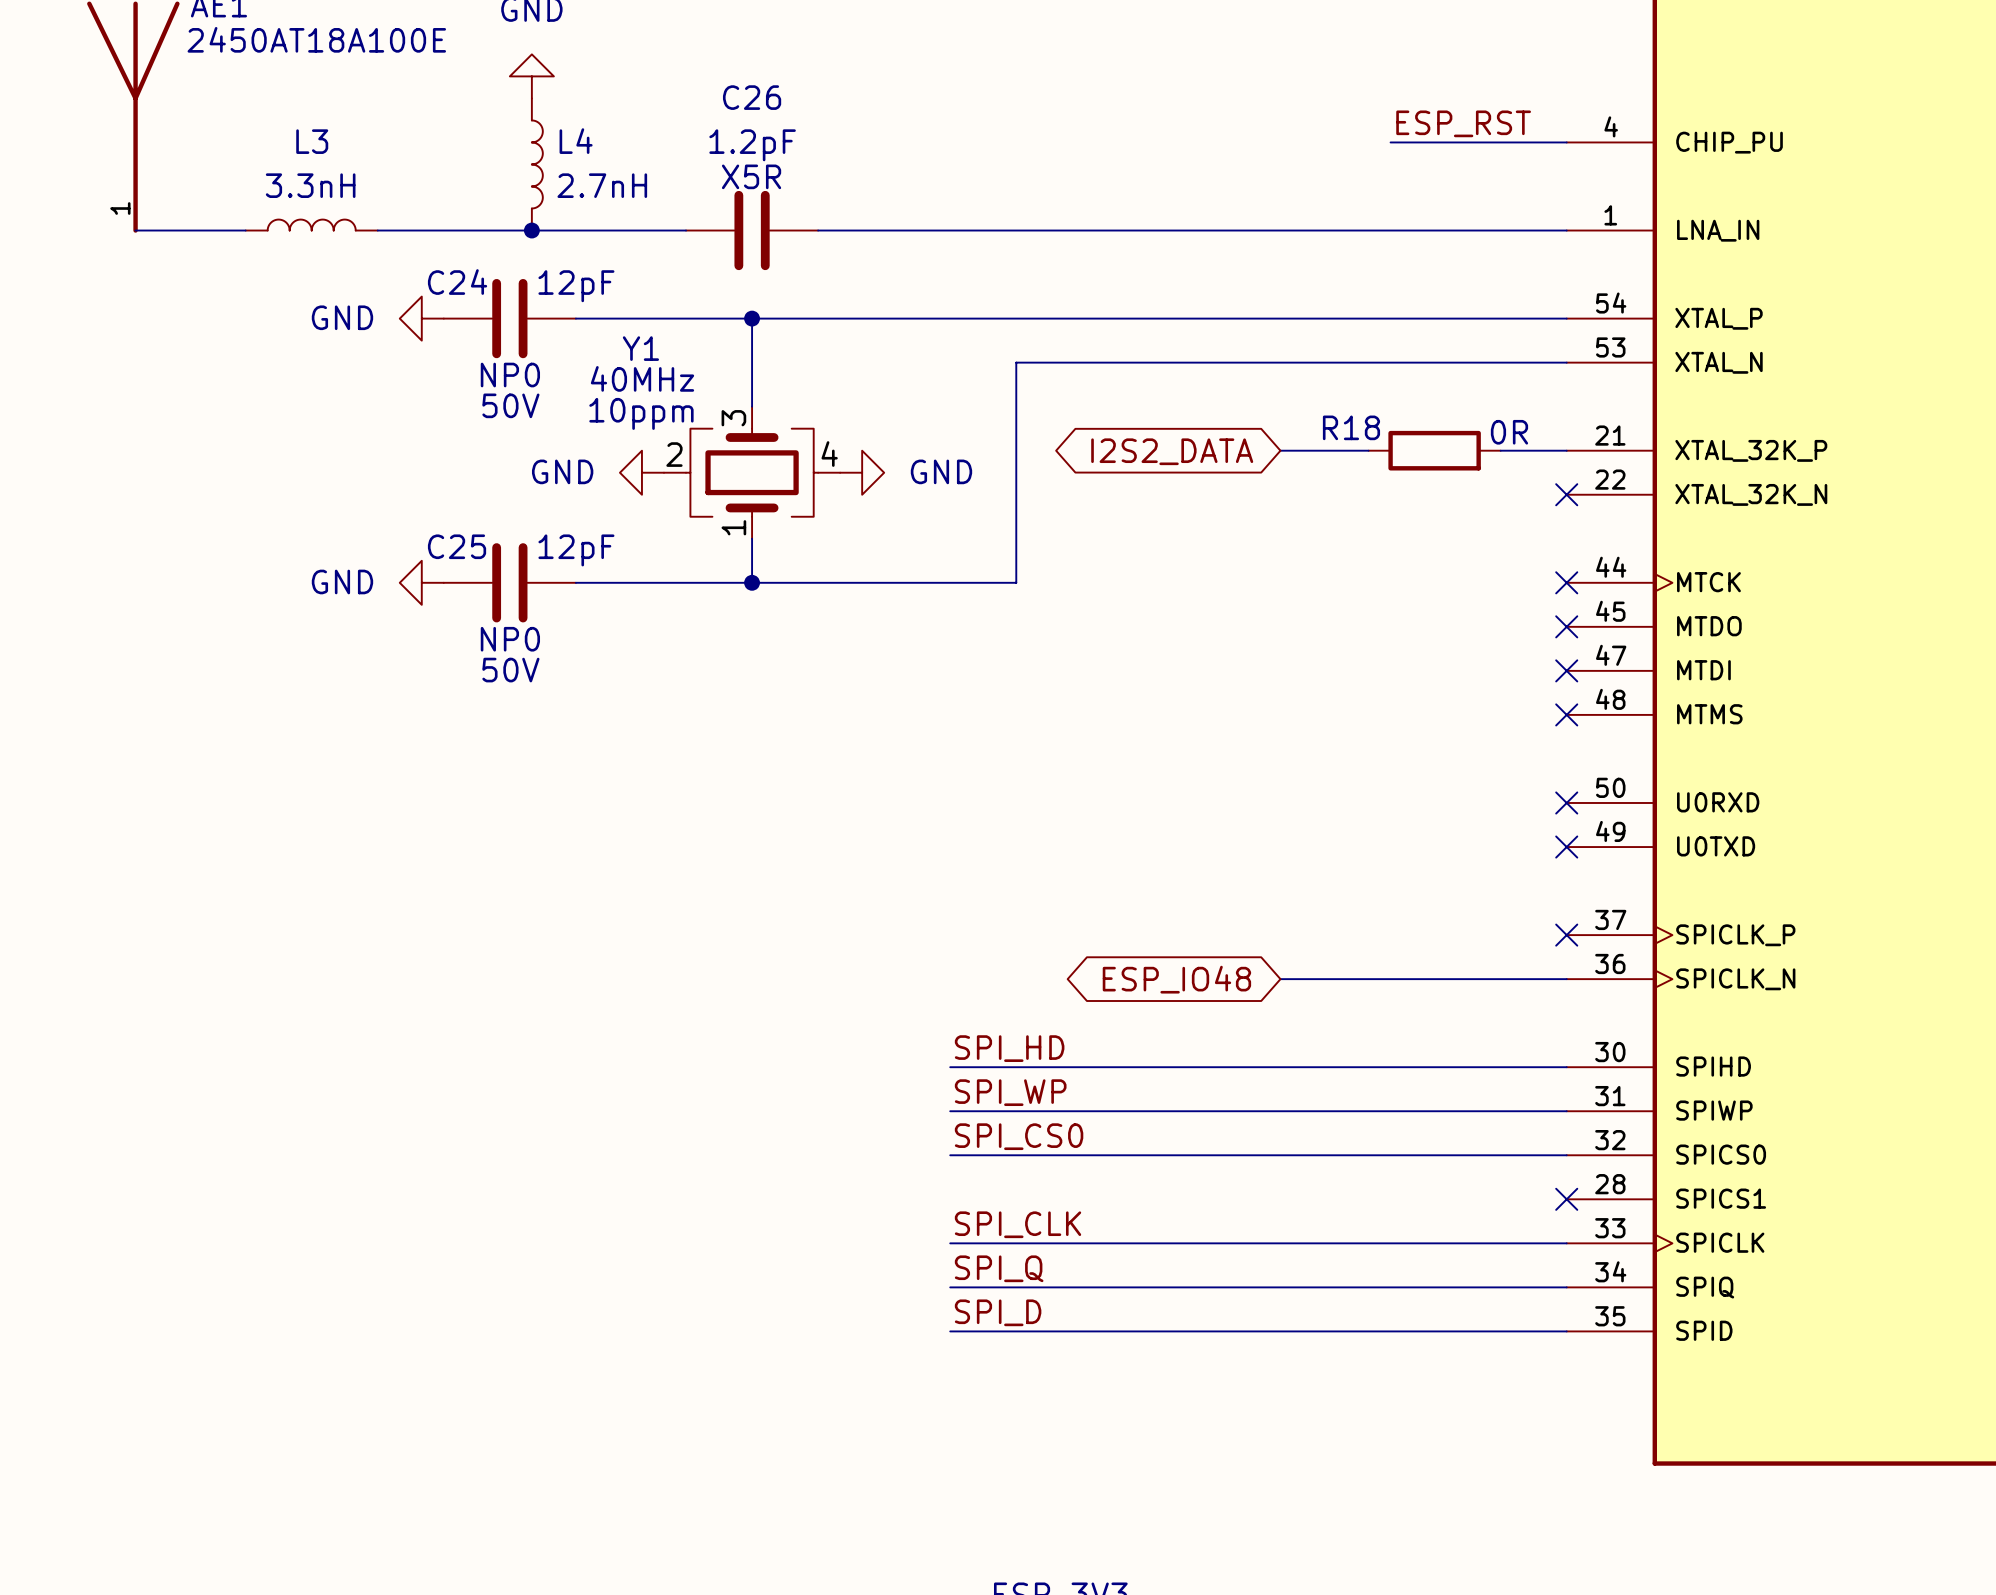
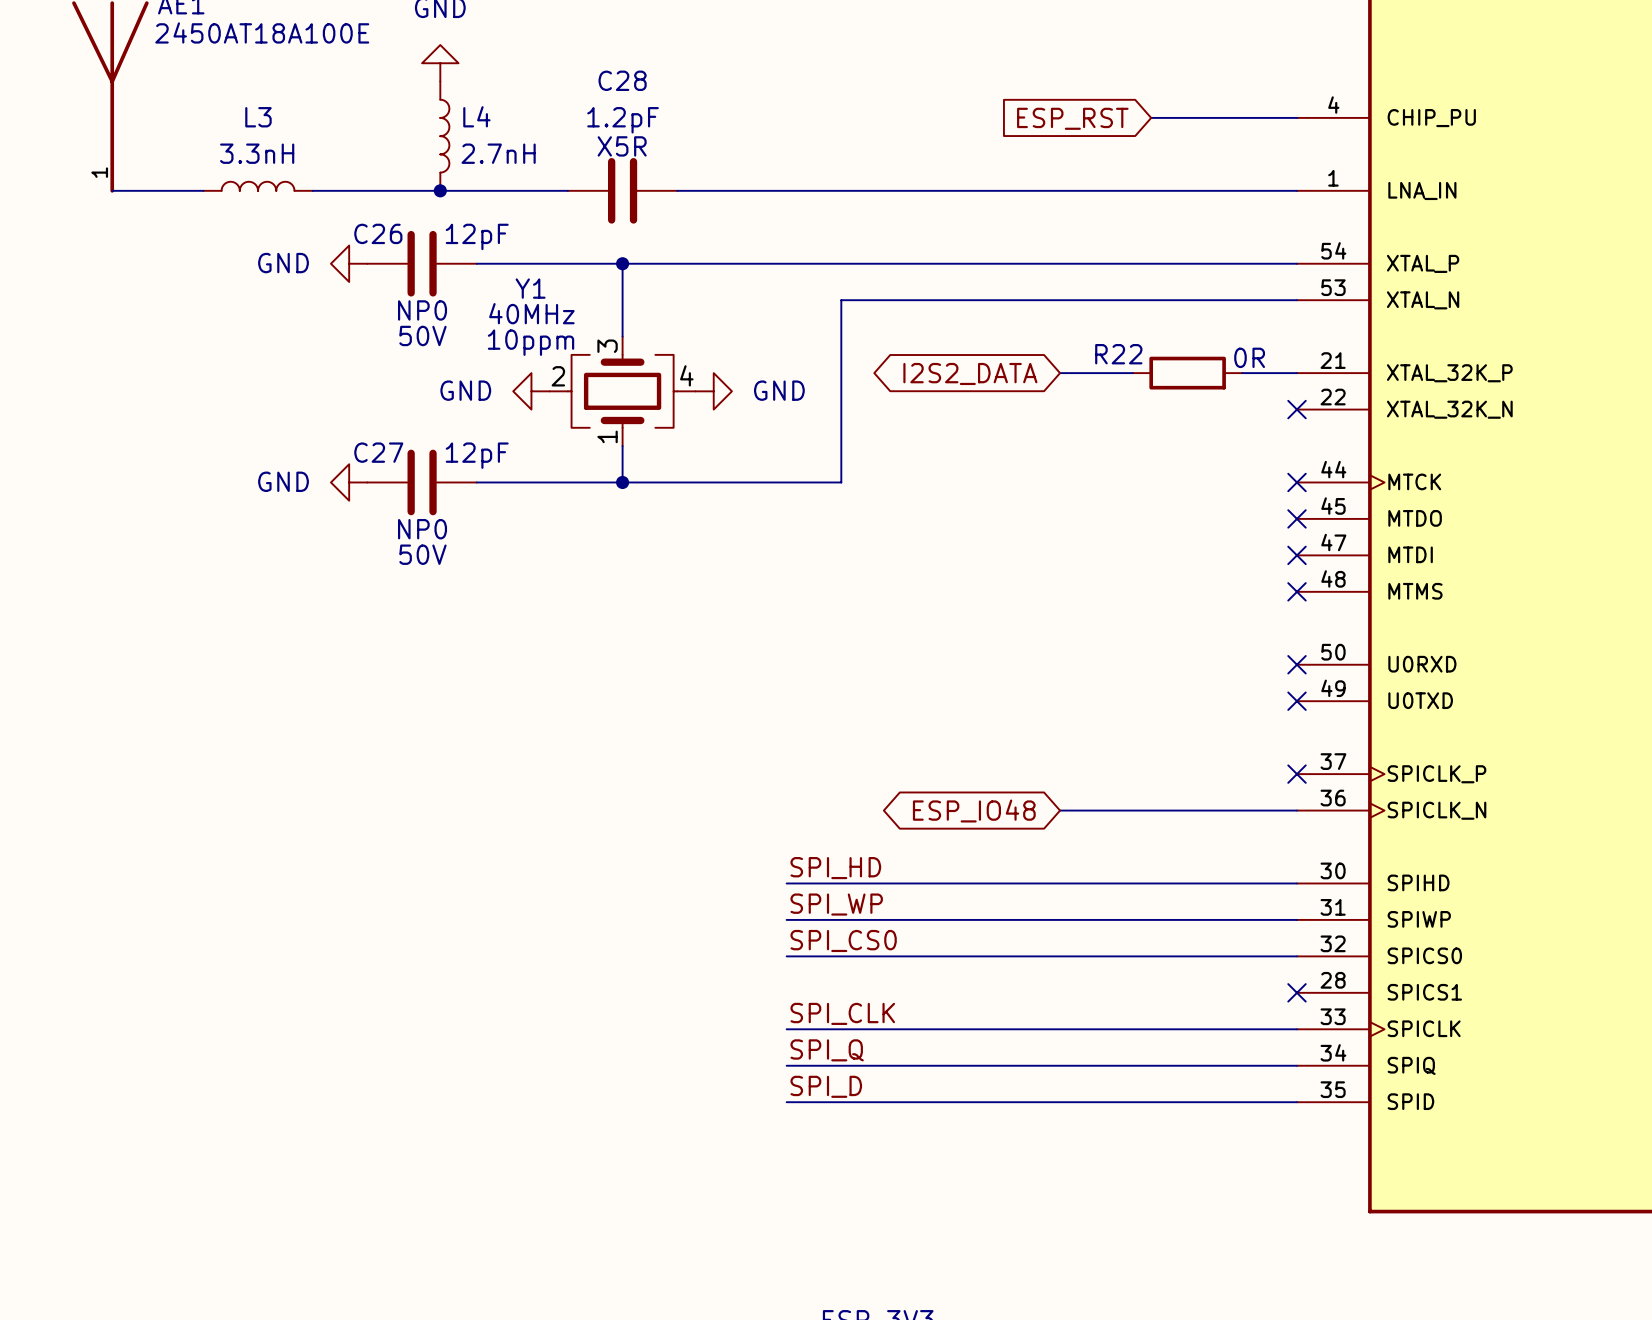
C26 name: C26 (752, 97) -> C28 (622, 80)
label: ESP_RST (1463, 123) -> none
global label: none -> ESP_RST (1072, 118)
C24 name: C24 (457, 282) -> C26 (378, 233)
R18 name: R18 (1351, 427) -> R22 (1118, 354)
C25 name: C25 (457, 546) -> C27 (378, 452)

